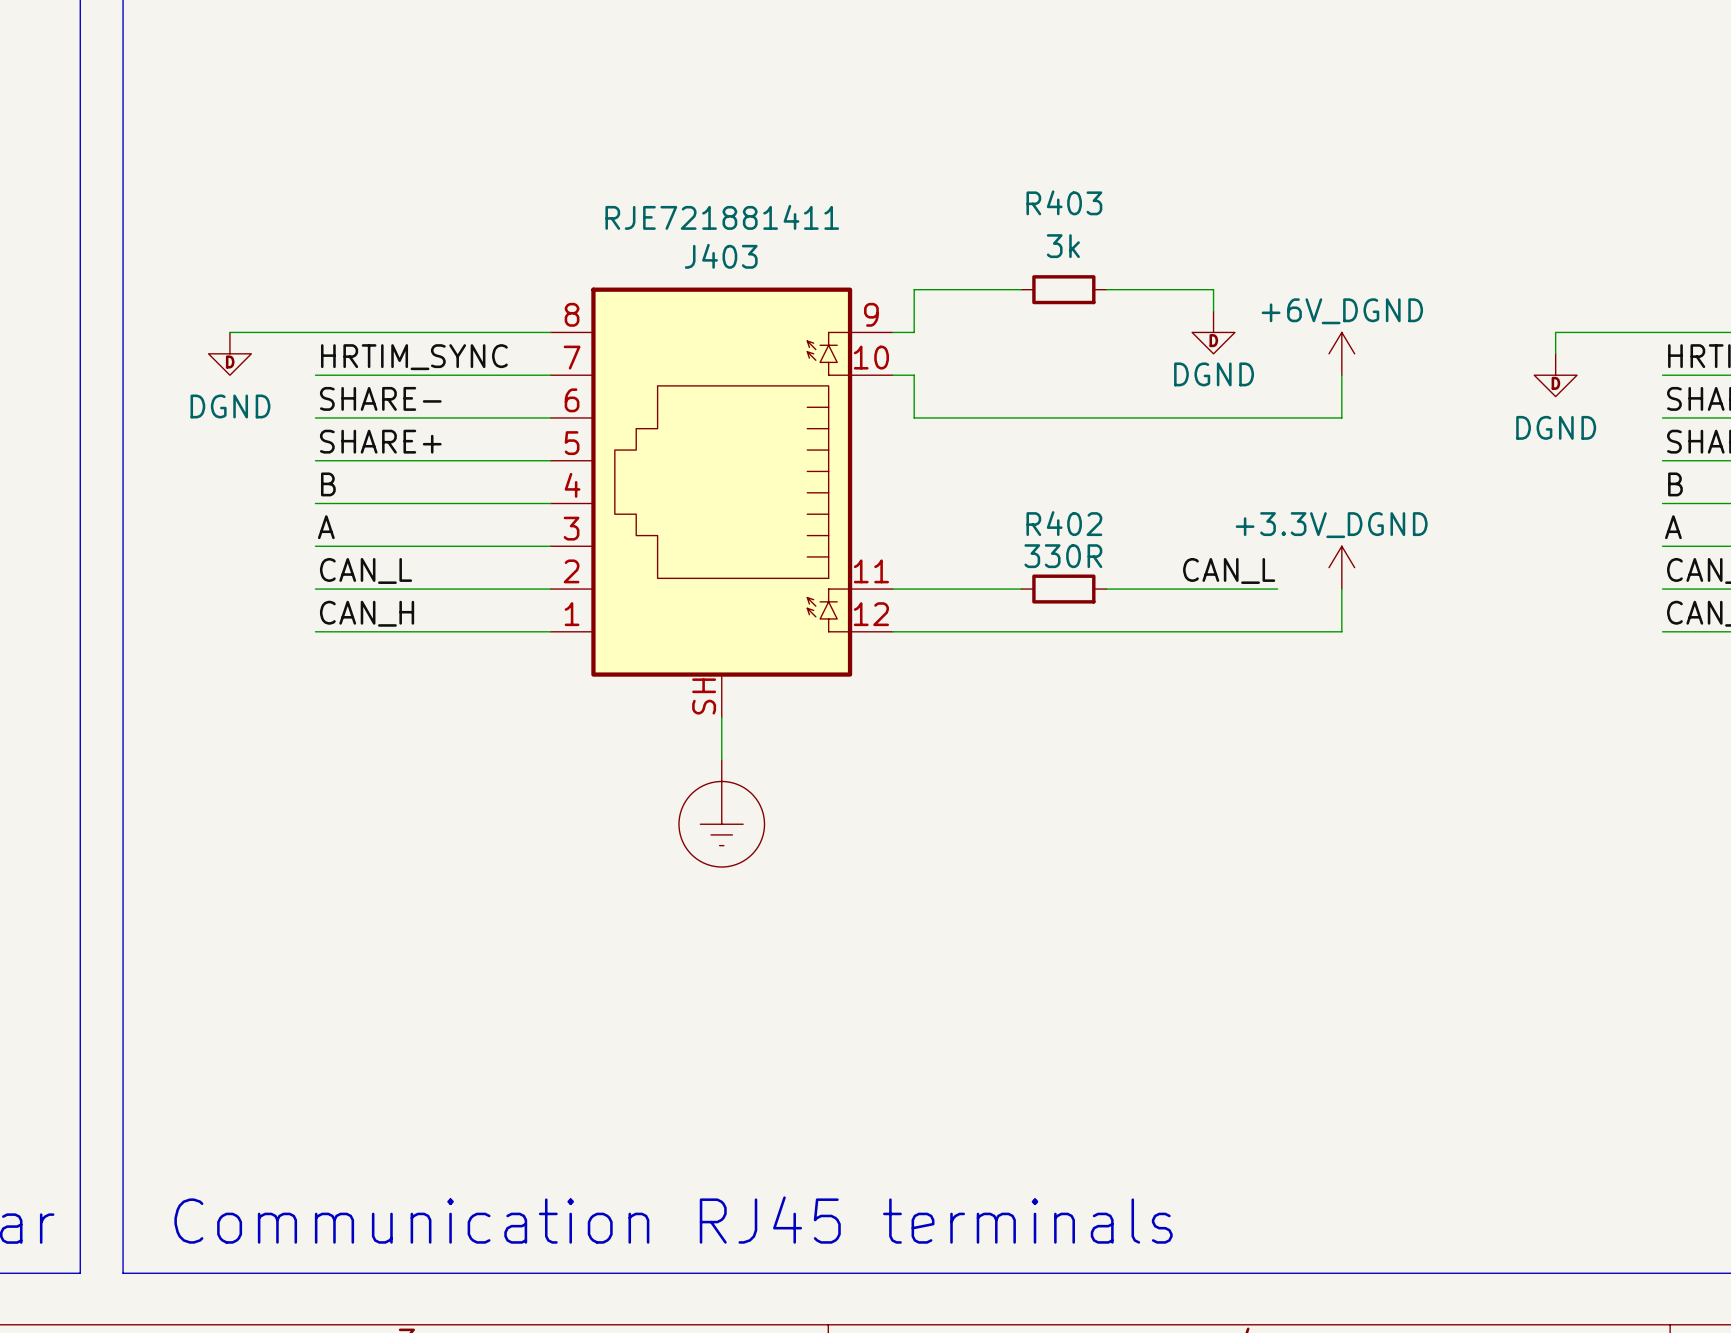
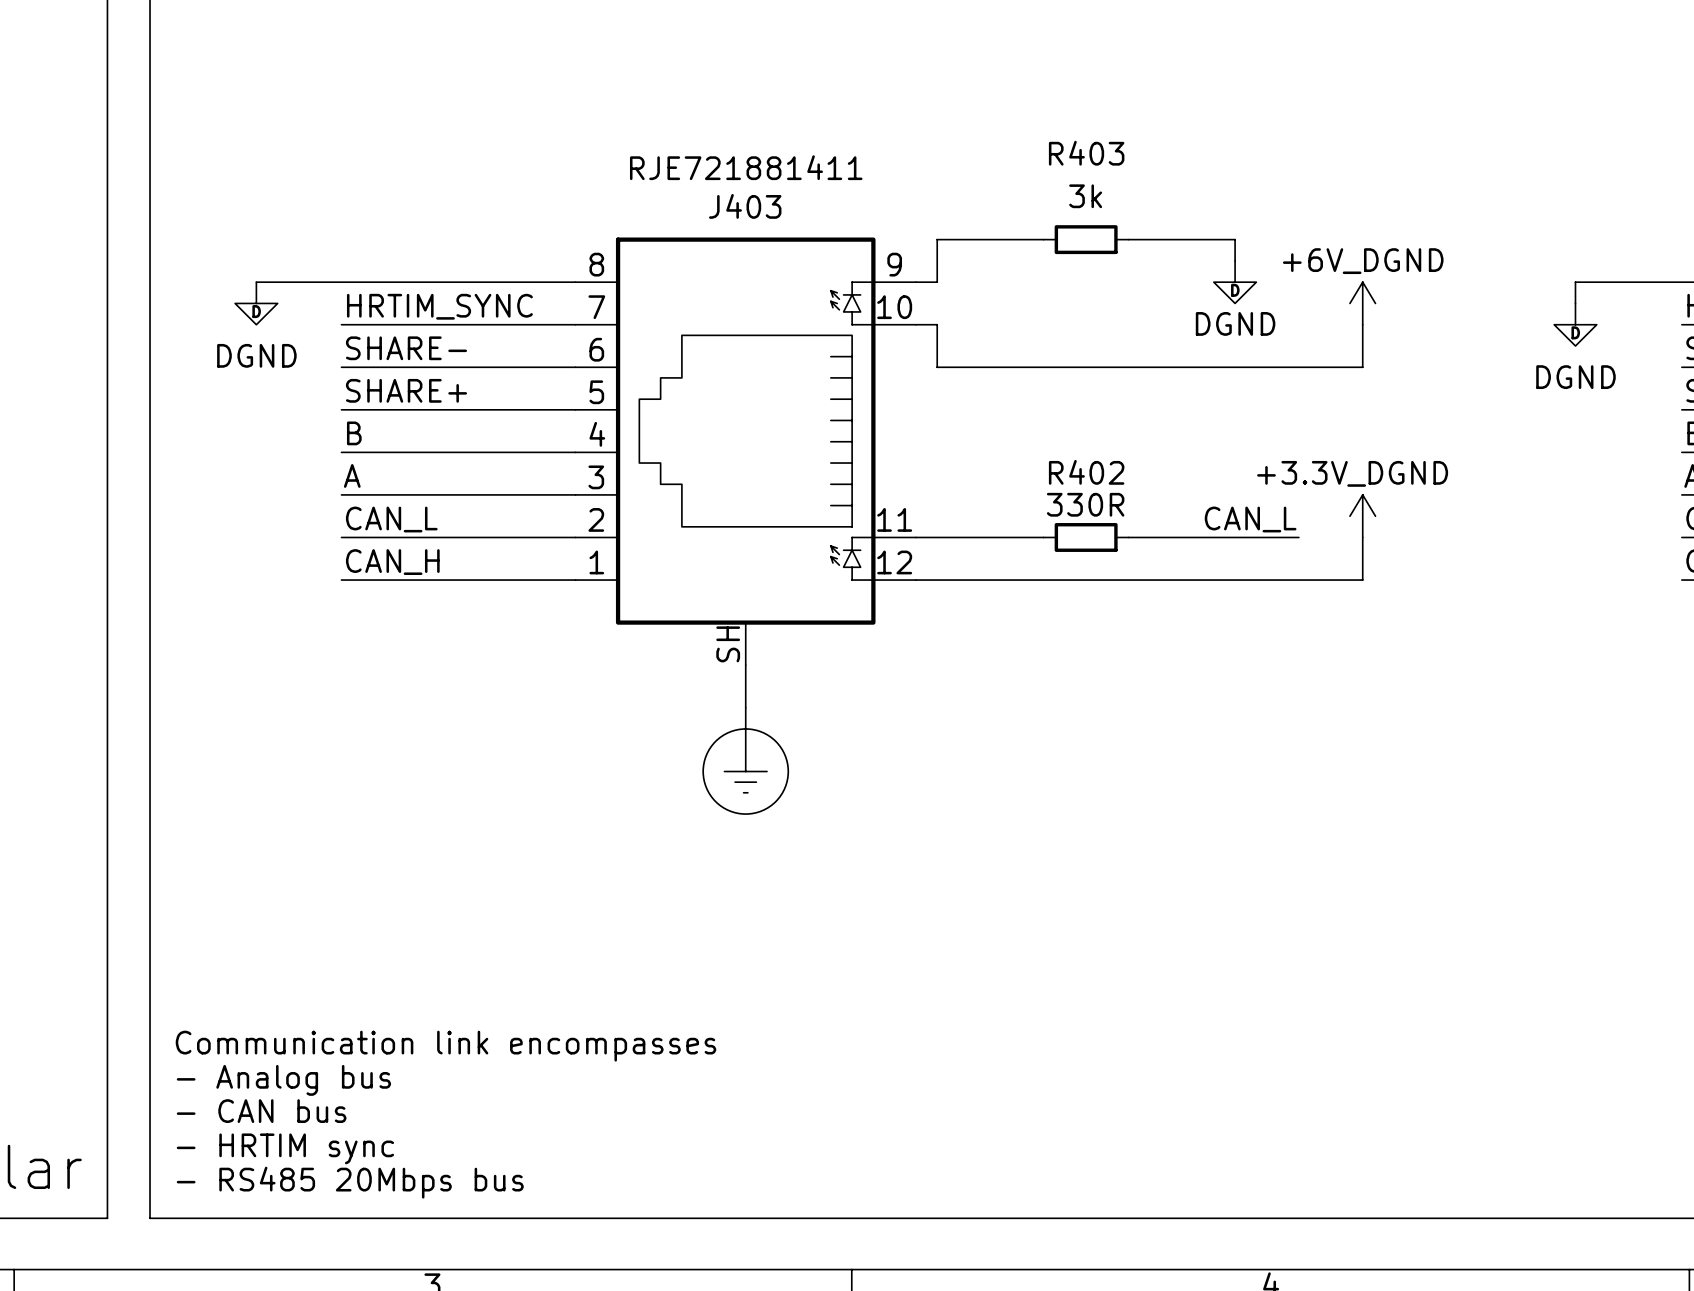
text: none -> Communication link encompasses (446, 1046)
text: none -> - Analog bus (283, 1080)
text: none -> - CAN bus (261, 1111)
text: none -> - HRTIM sync (285, 1148)
text: Communication RJ45 terminals (673, 1220) -> none
text: none -> - RS485 20Mbps bus (350, 1182)

